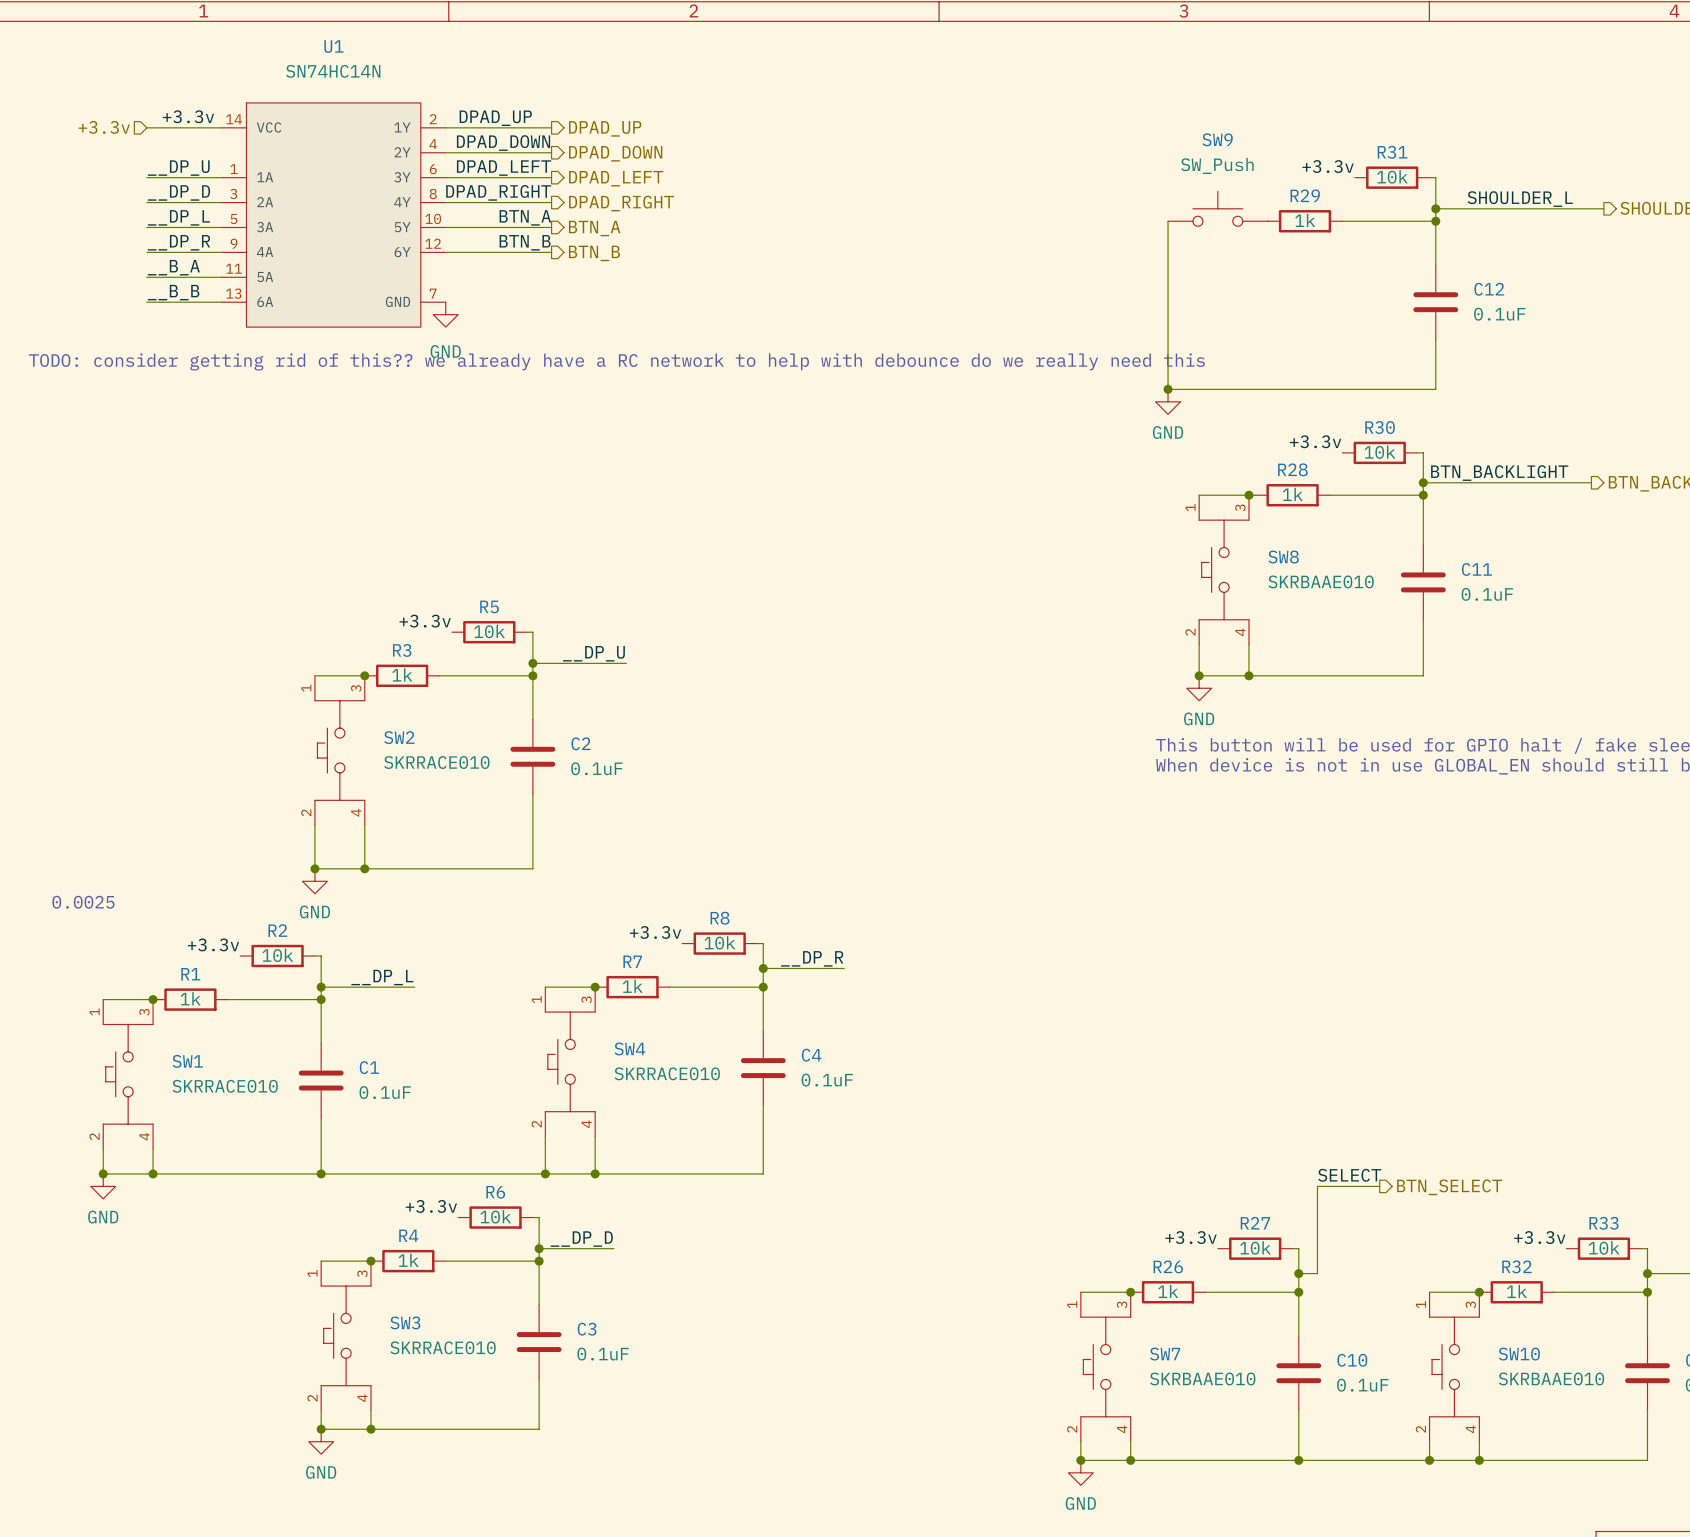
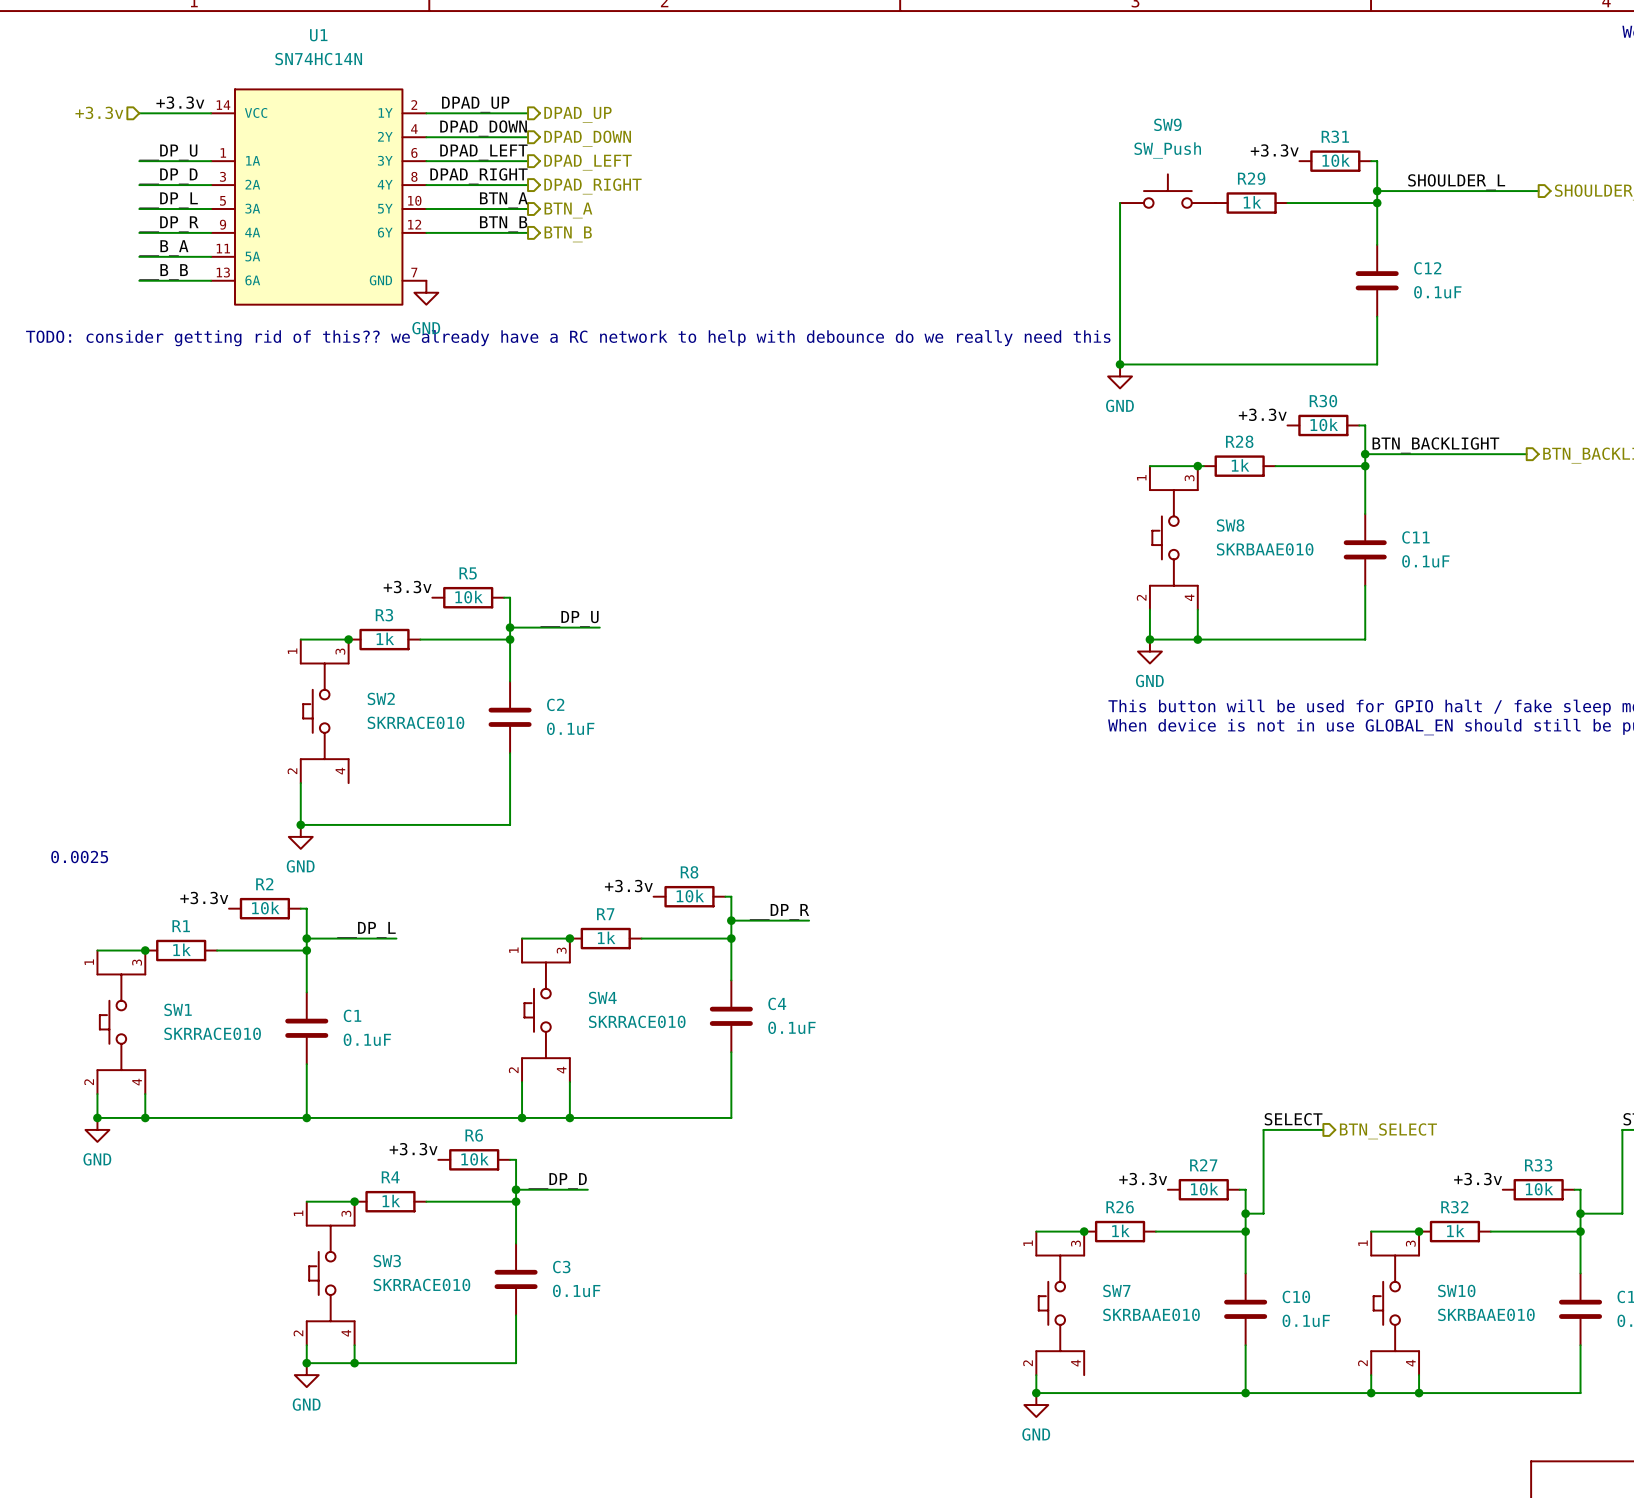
wire: (364, 825) (364, 868) -> none
junction: (364, 868) -> none
wire: (1130, 1441) (1130, 1460) -> none
junction: (1130, 1460) -> none

